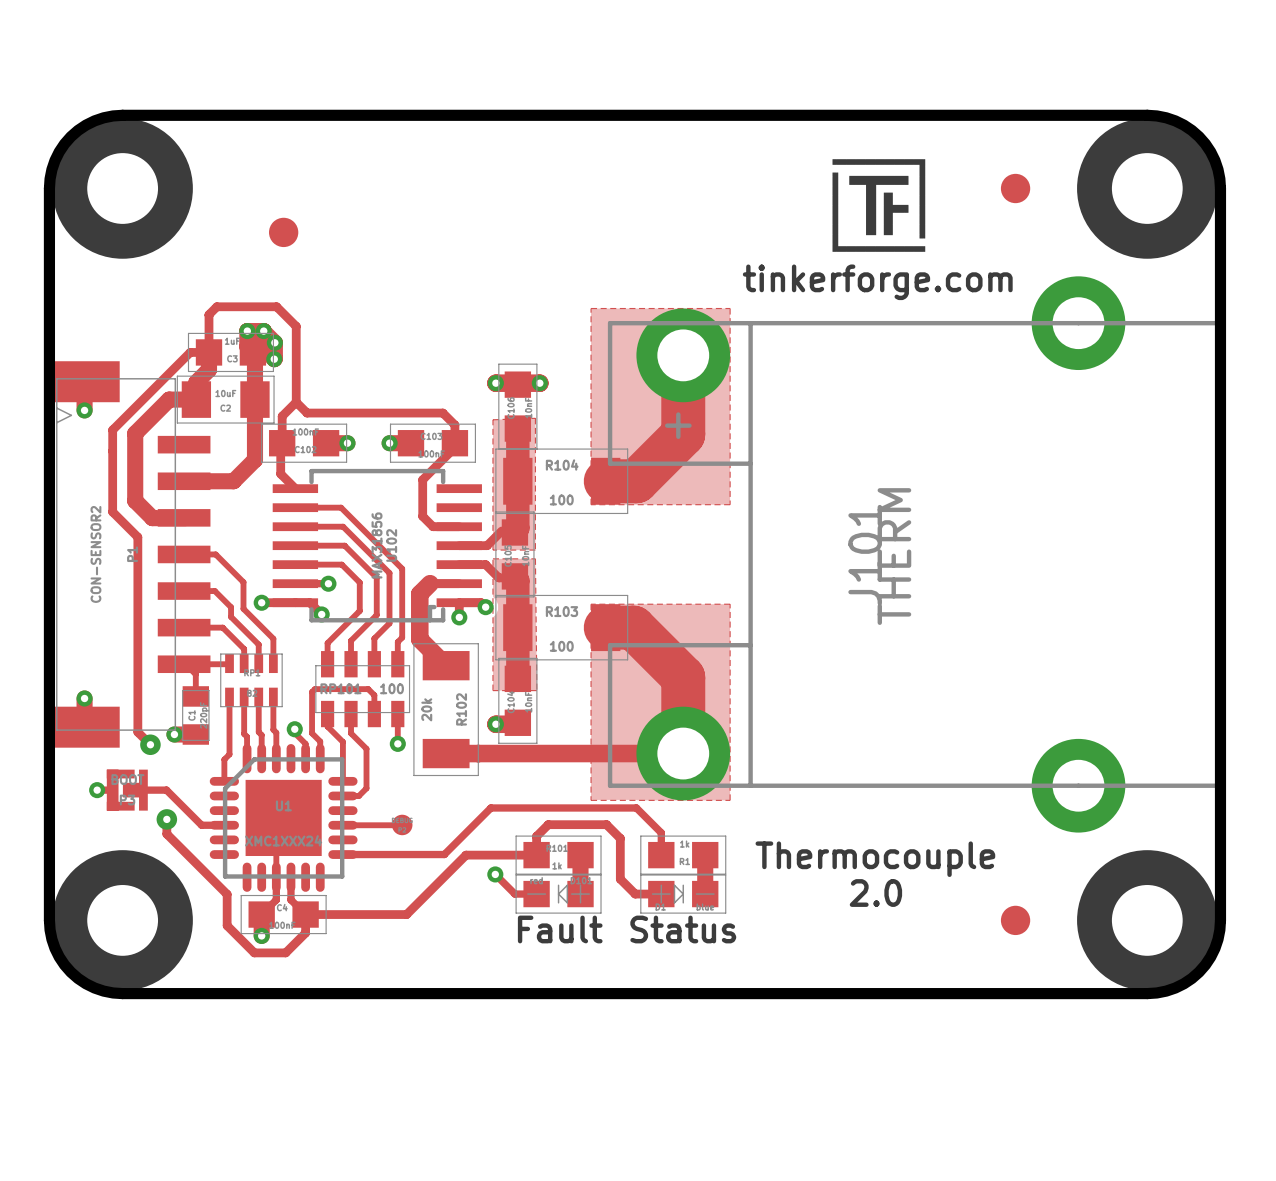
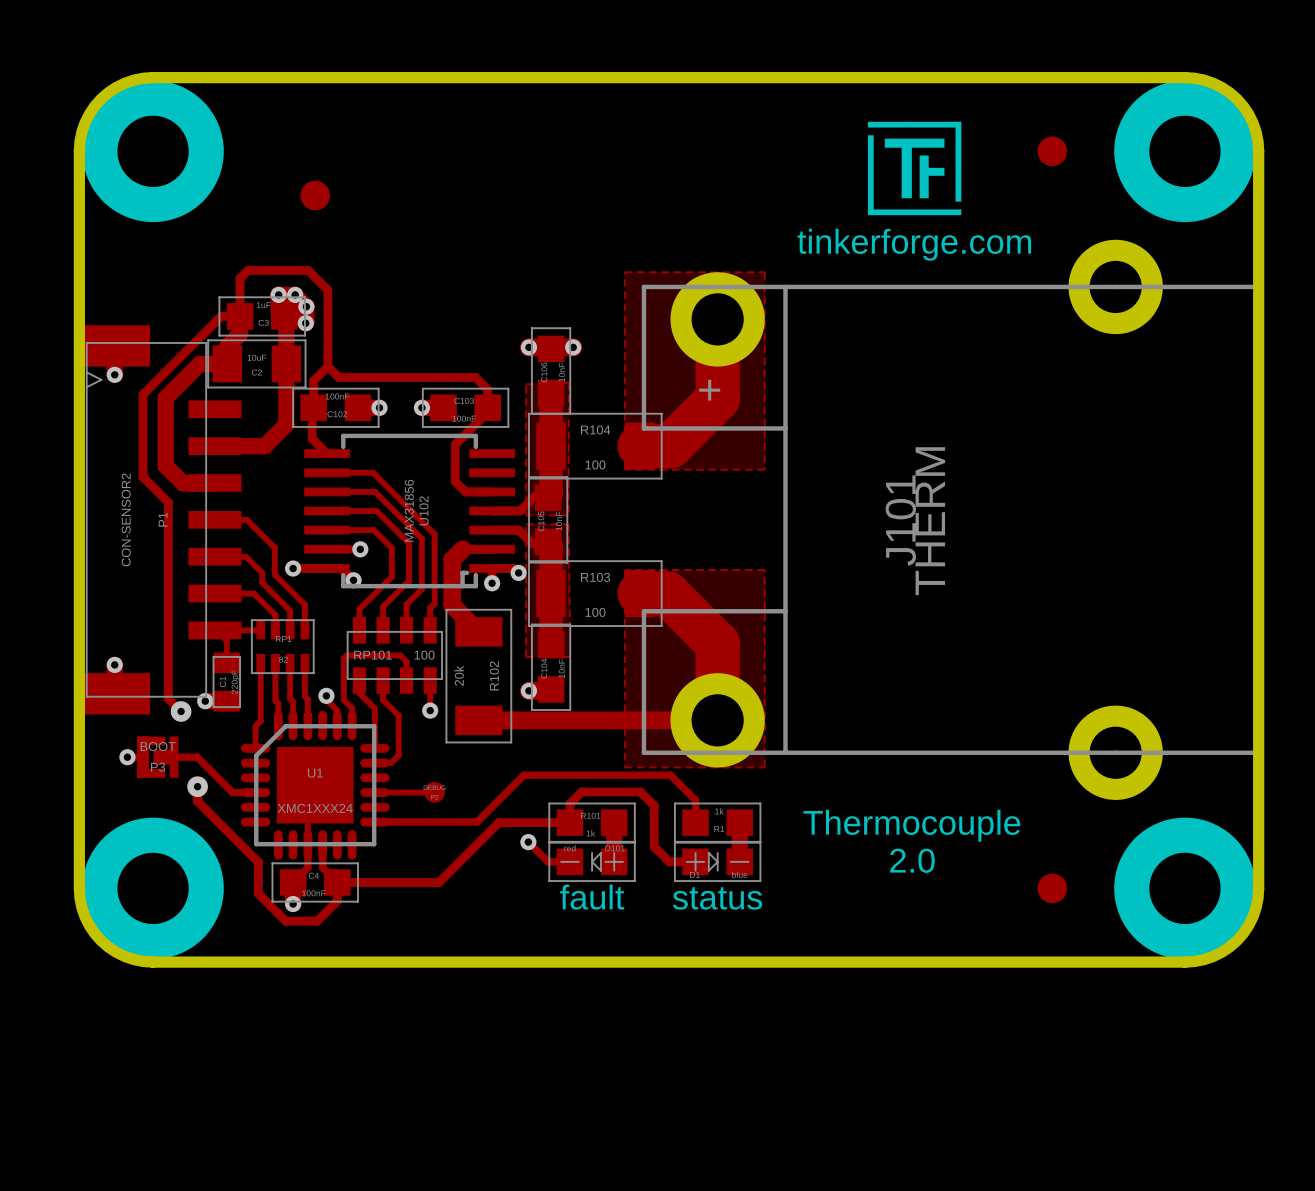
text: Fault (560, 929) -> fault (592, 897)
text: Status (683, 929) -> status (717, 898)

